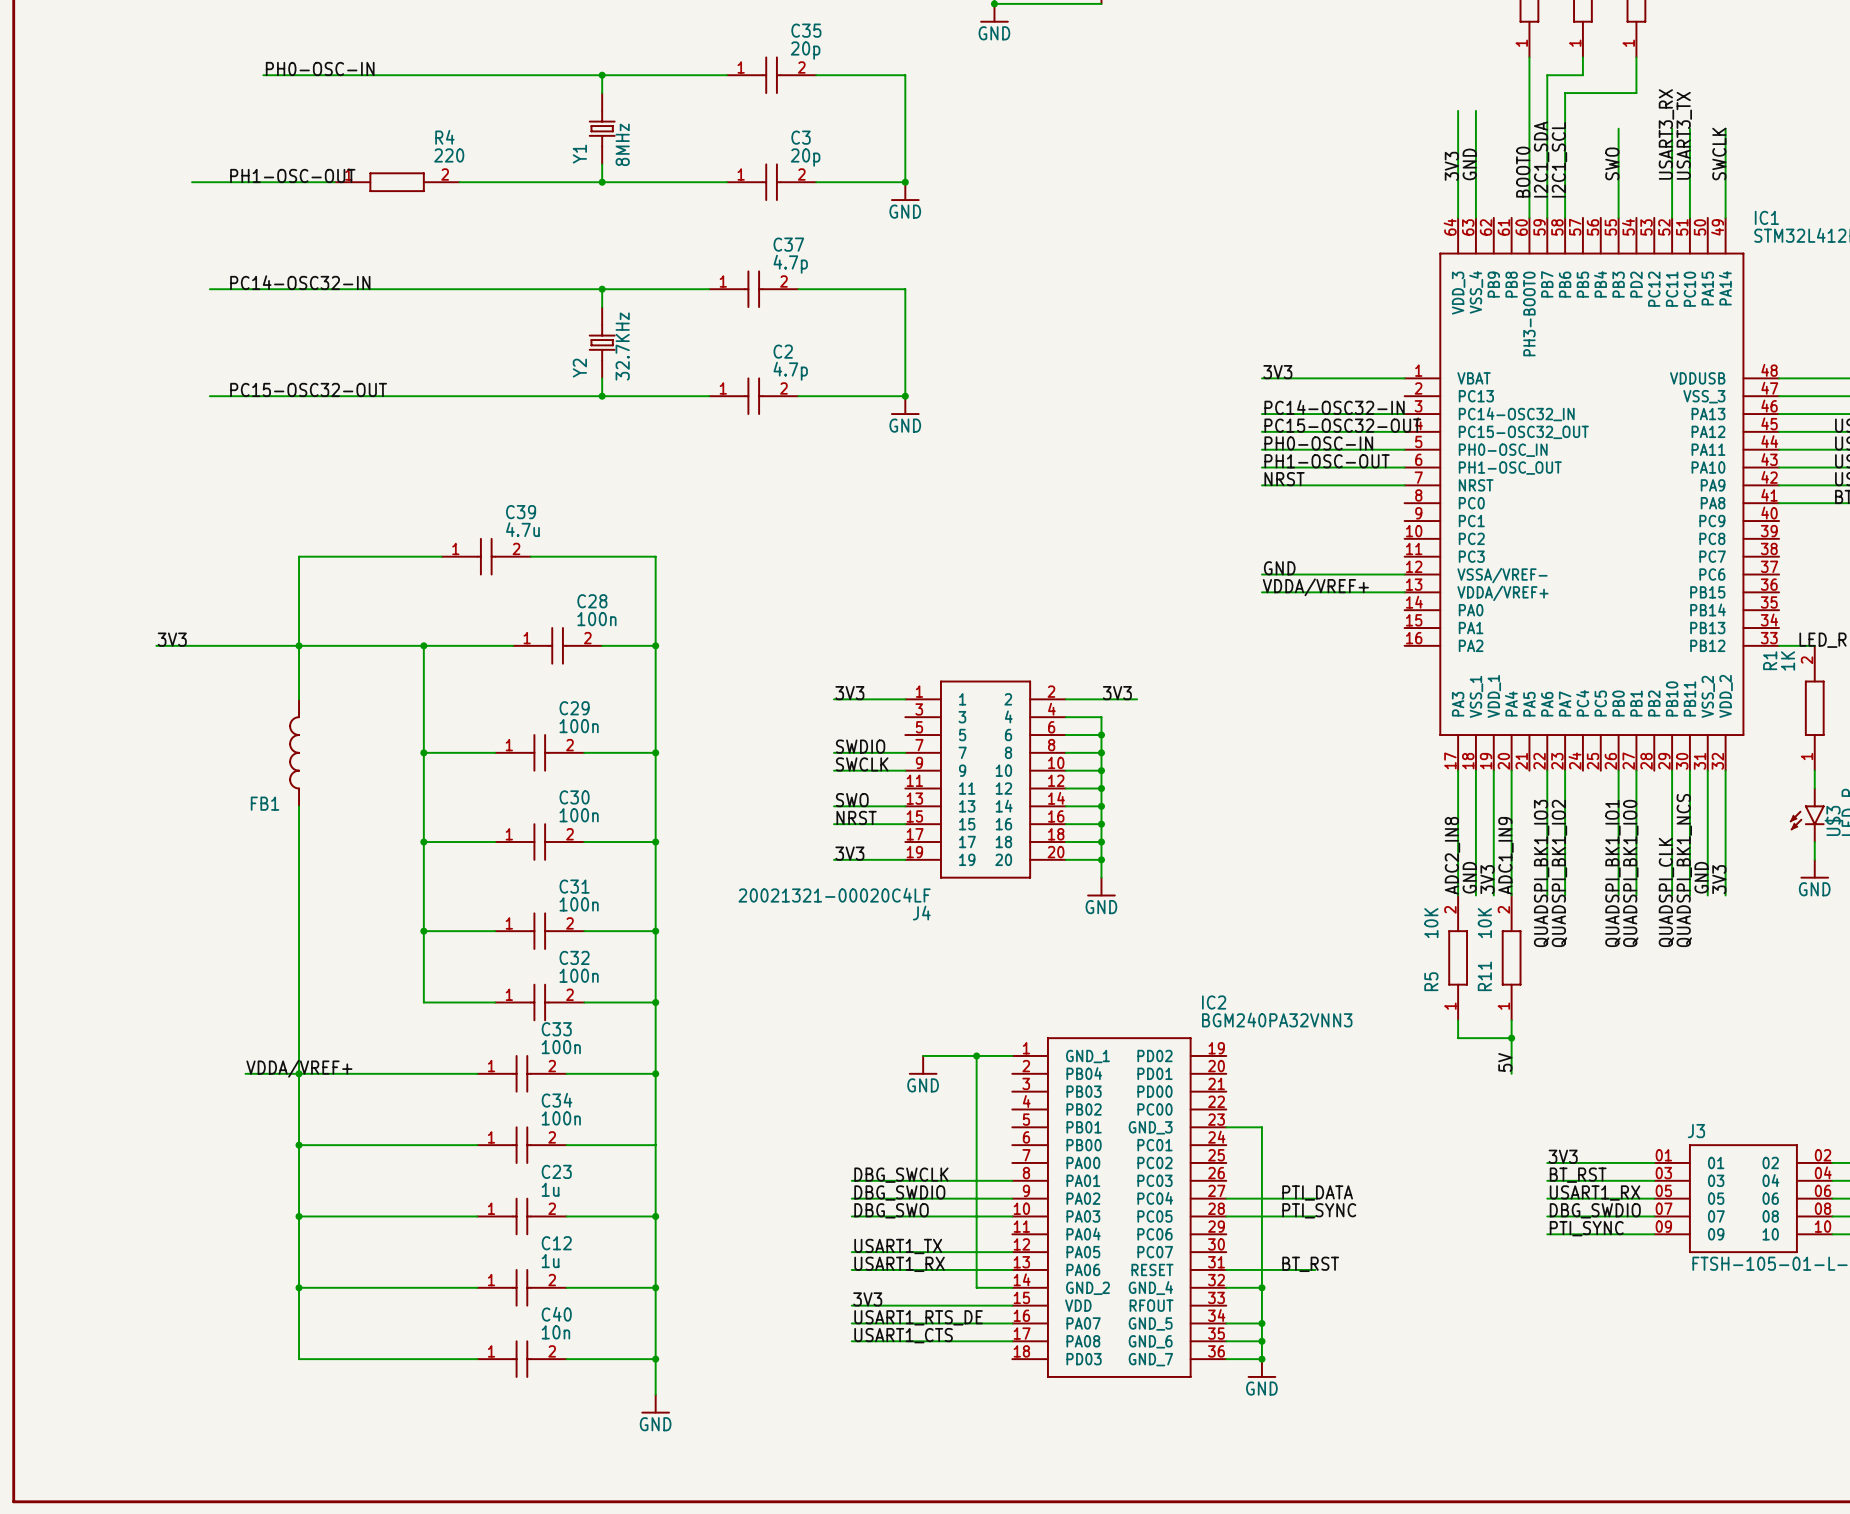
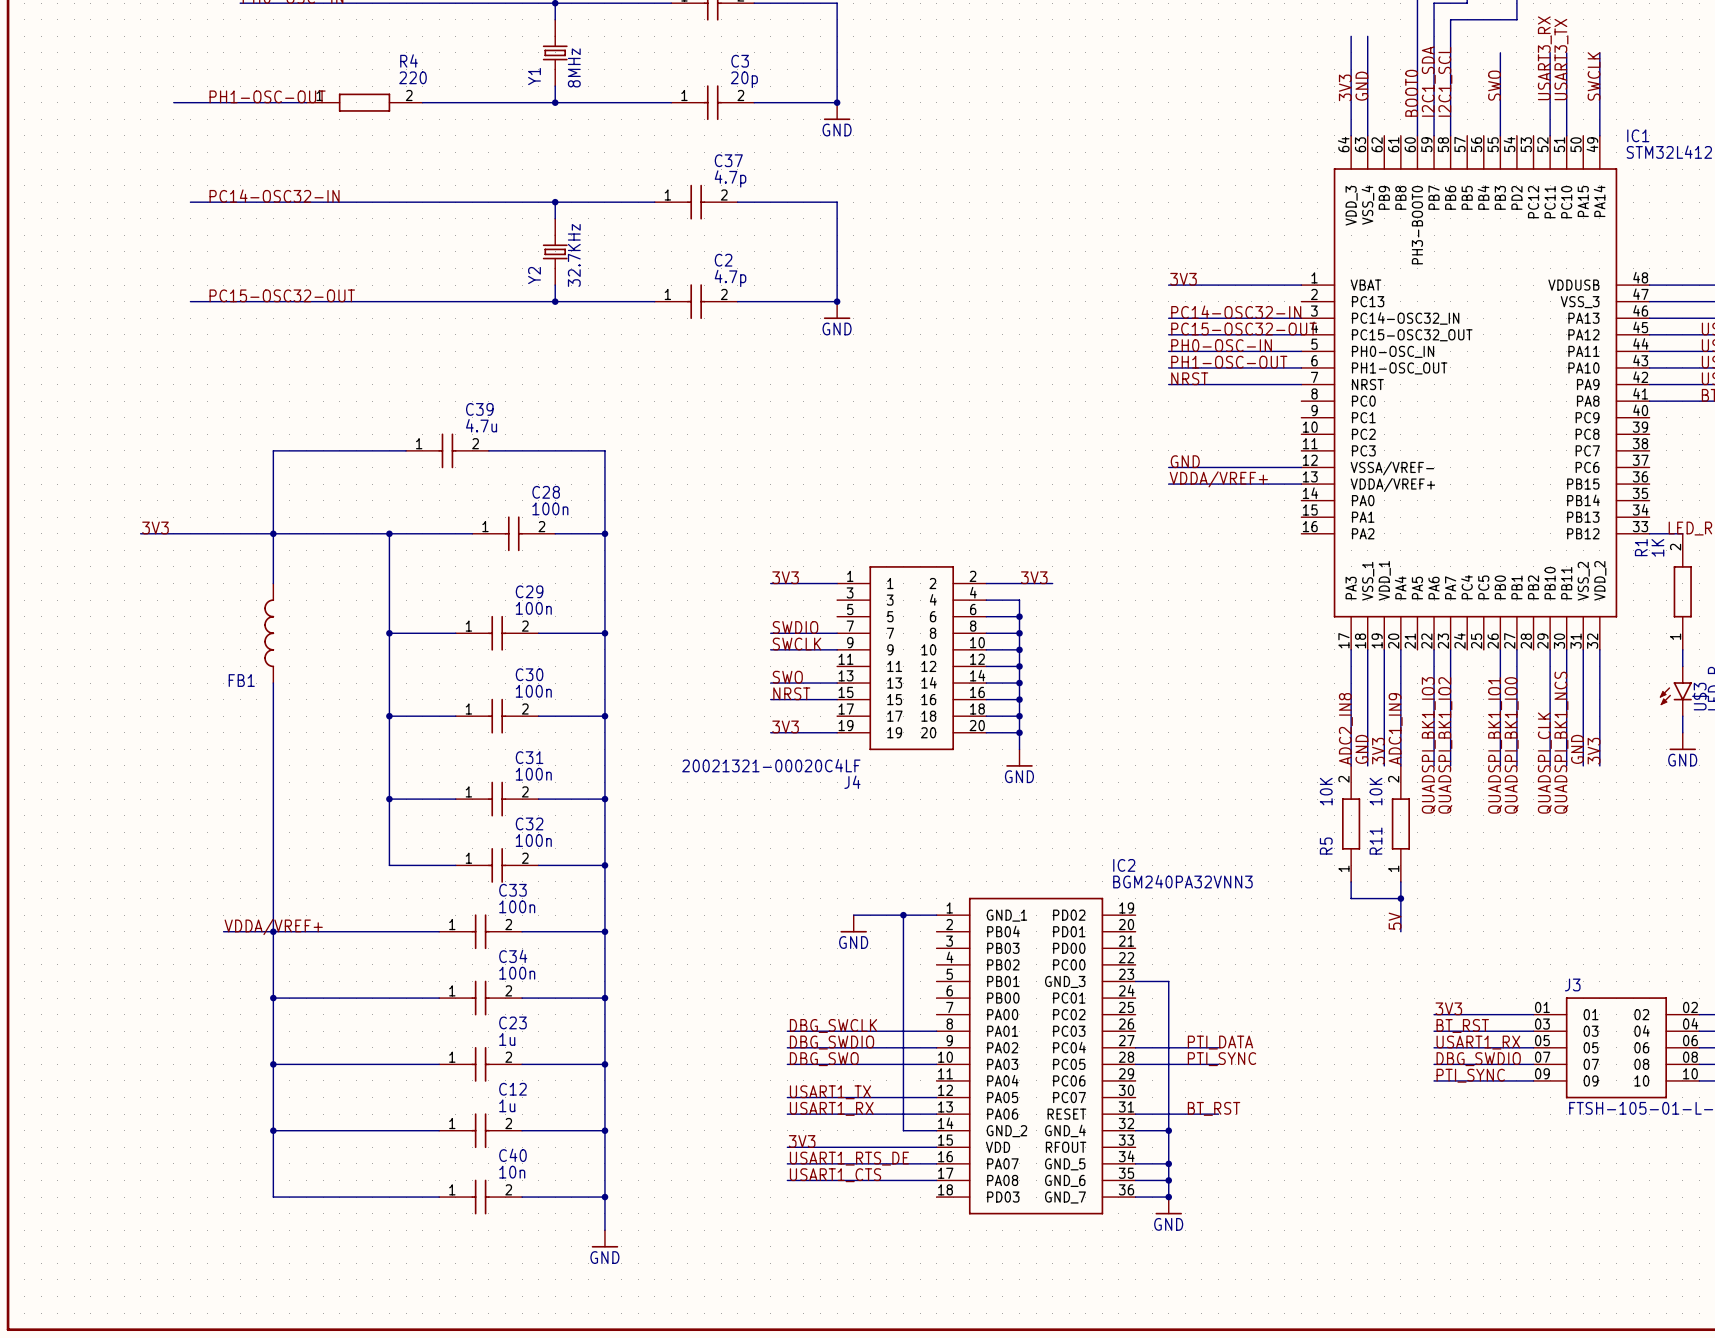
junction: none -> (604, 998)

